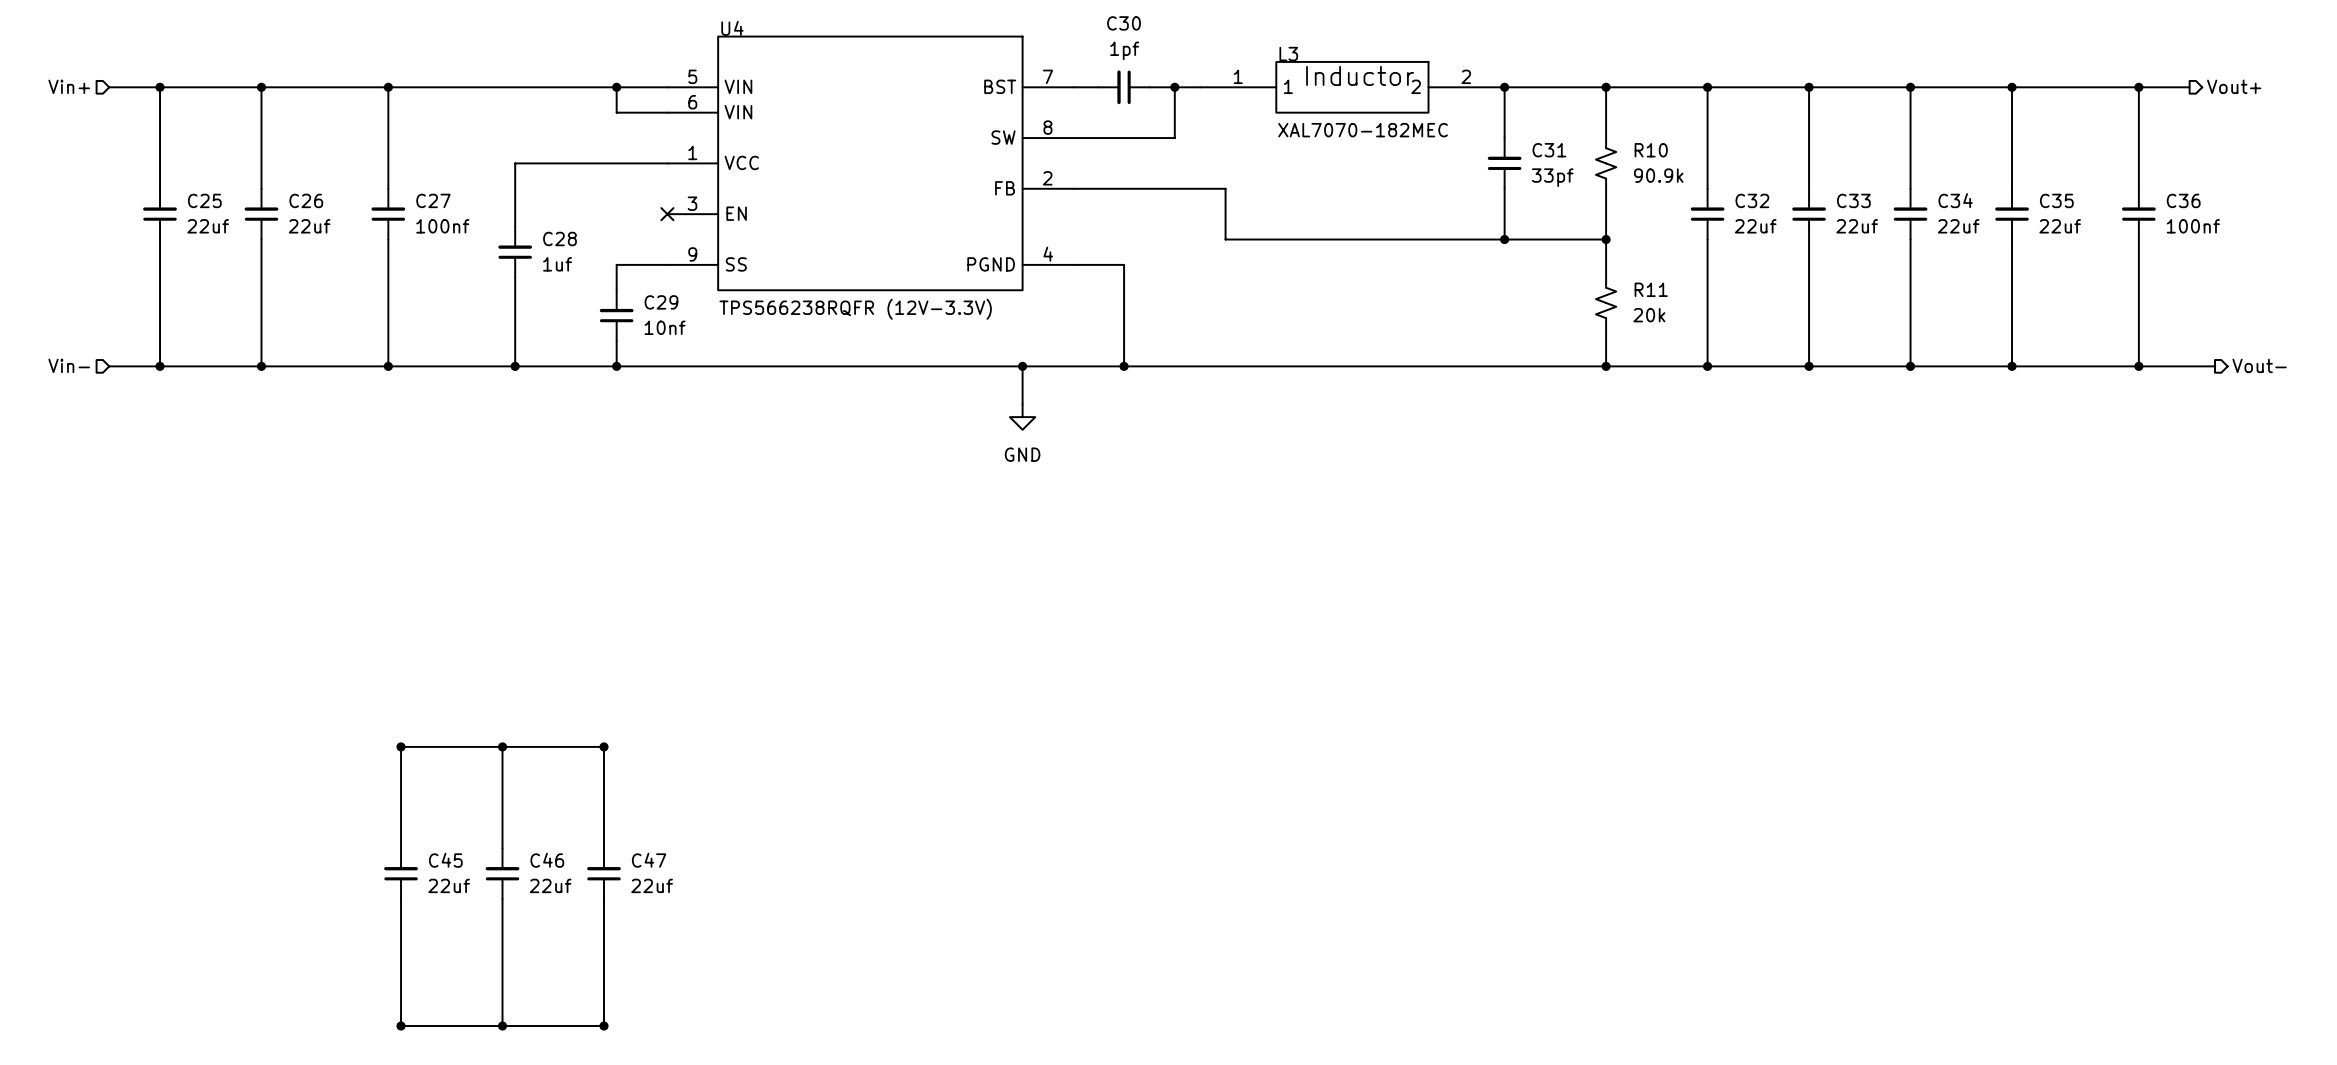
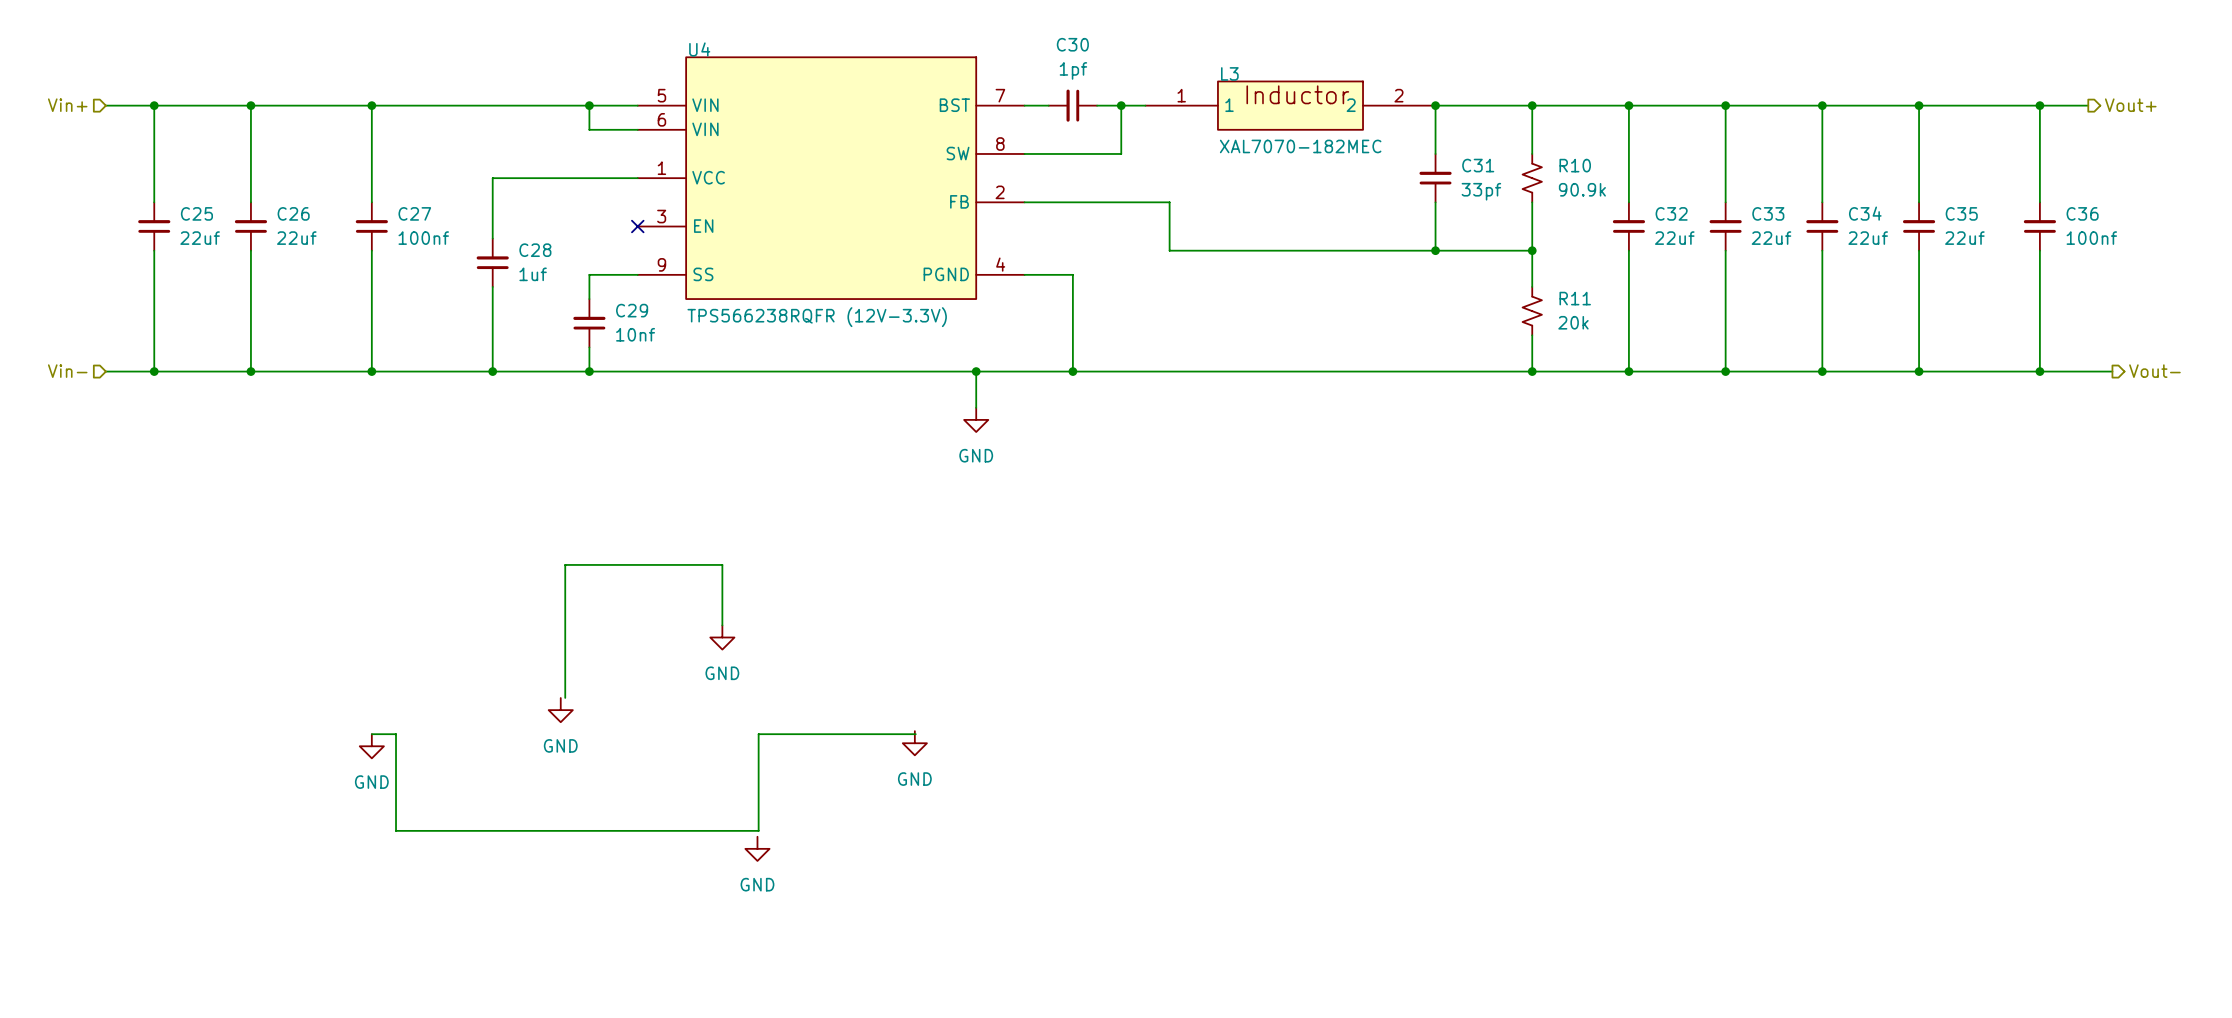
wire: none -> (722, 625) (722, 564) (565, 564) (565, 697)
power symbol: none -> GND (722, 637)
power symbol: none -> GND (560, 710)
wire: (401, 746) (401, 848) -> (383, 734) (371, 734)
junction: (401, 746) -> none
wire: (413, 746) (603, 746) (603, 848) -> (396, 734) (396, 830) (758, 830) (758, 734) (915, 734)
wire: (502, 746) (502, 848) -> none
junction: (502, 746) -> none
junction: (603, 746) -> none
power symbol: none -> GND (914, 743)
power symbol: none -> GND (371, 746)
power symbol: none -> GND (757, 848)
C45: 22uf (401, 873) -> none
C46: 22uf (502, 873) -> none
C47: 22uf (603, 873) -> none
wire: (401, 899) (401, 1026) (603, 1026) (603, 899) -> none
wire: (502, 899) (502, 1026) -> none
junction: (401, 1026) -> none
junction: (502, 1026) -> none
junction: (603, 1026) -> none

